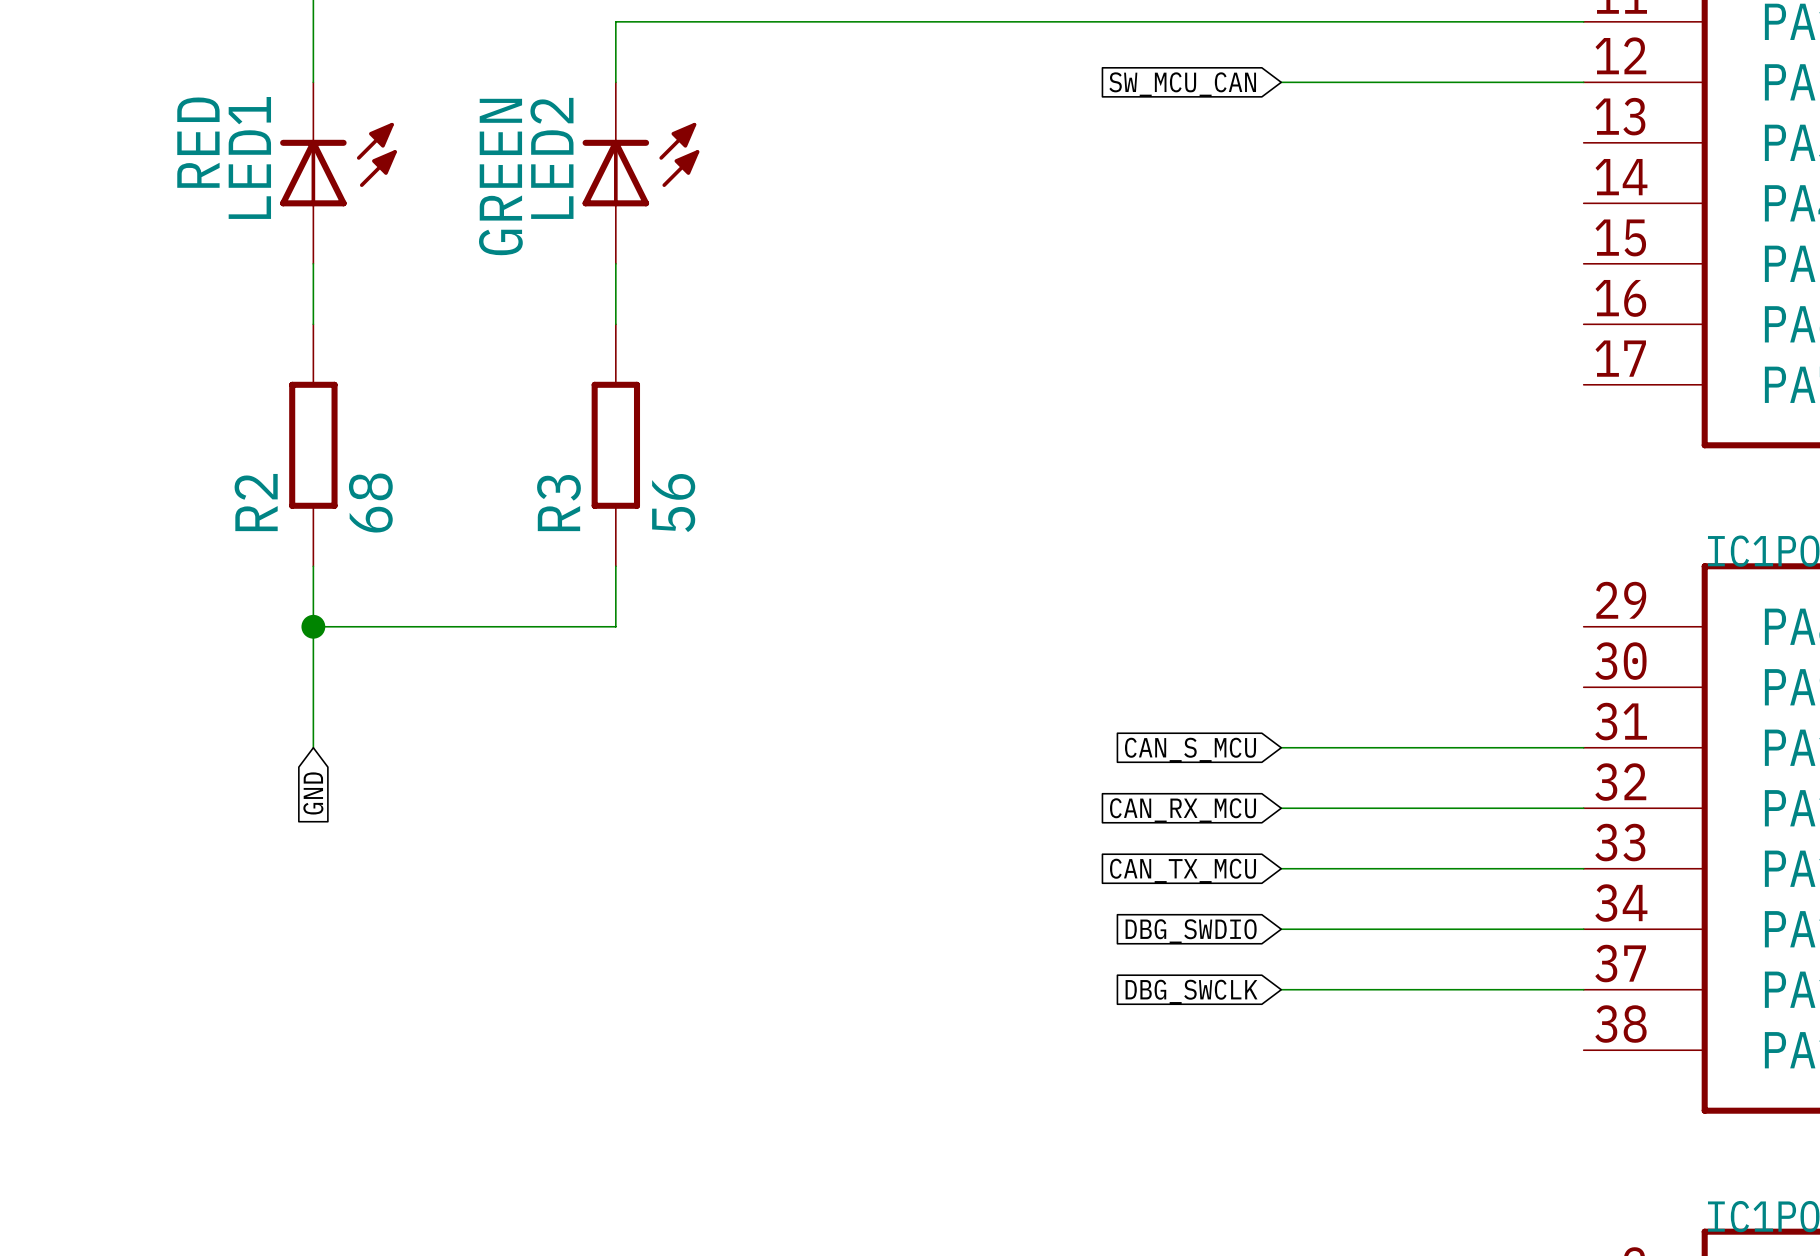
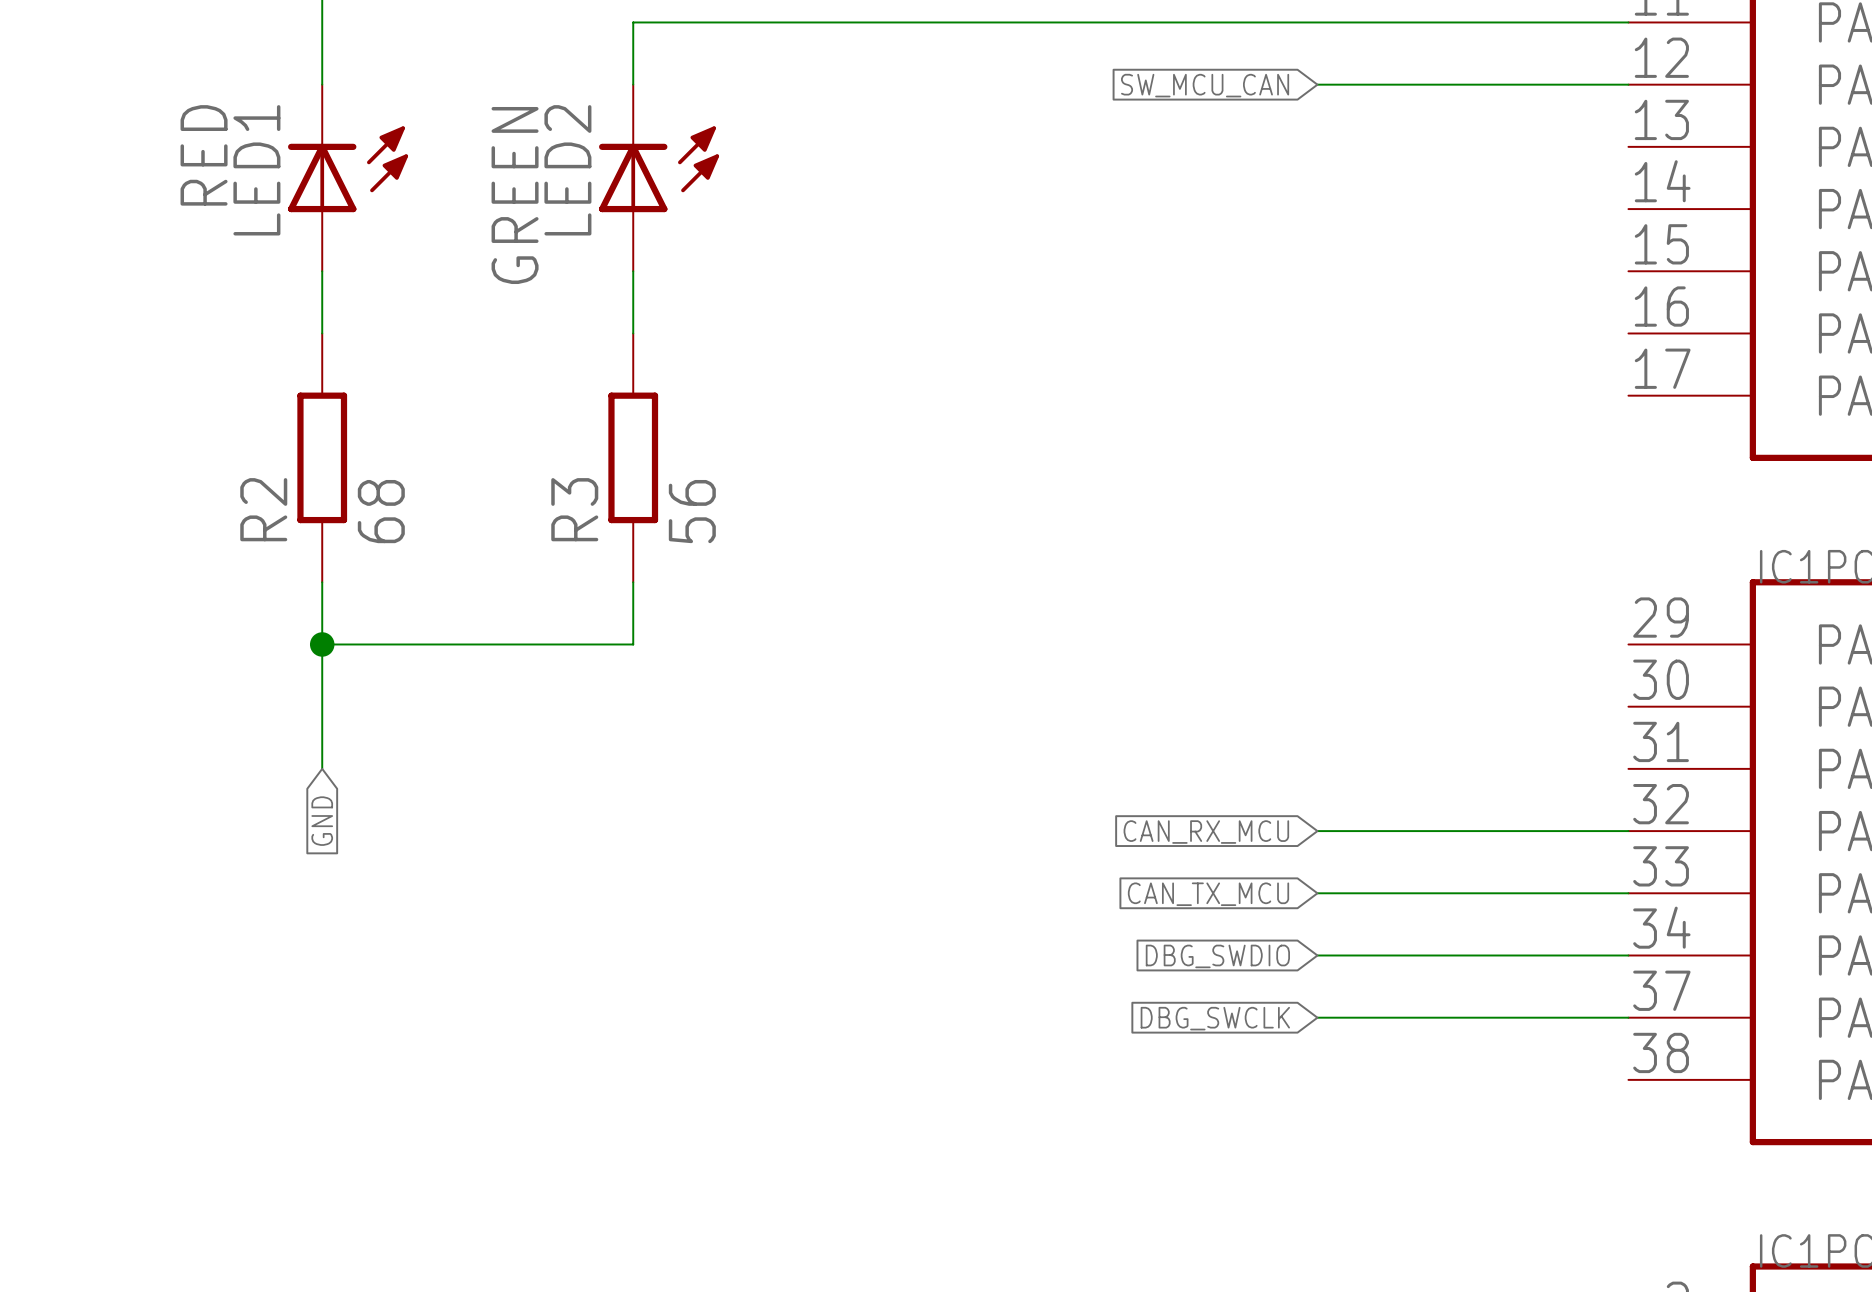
wire: (1281, 747) (1583, 747) -> none
global label: CAN_S_MCU (1190, 749) -> none

